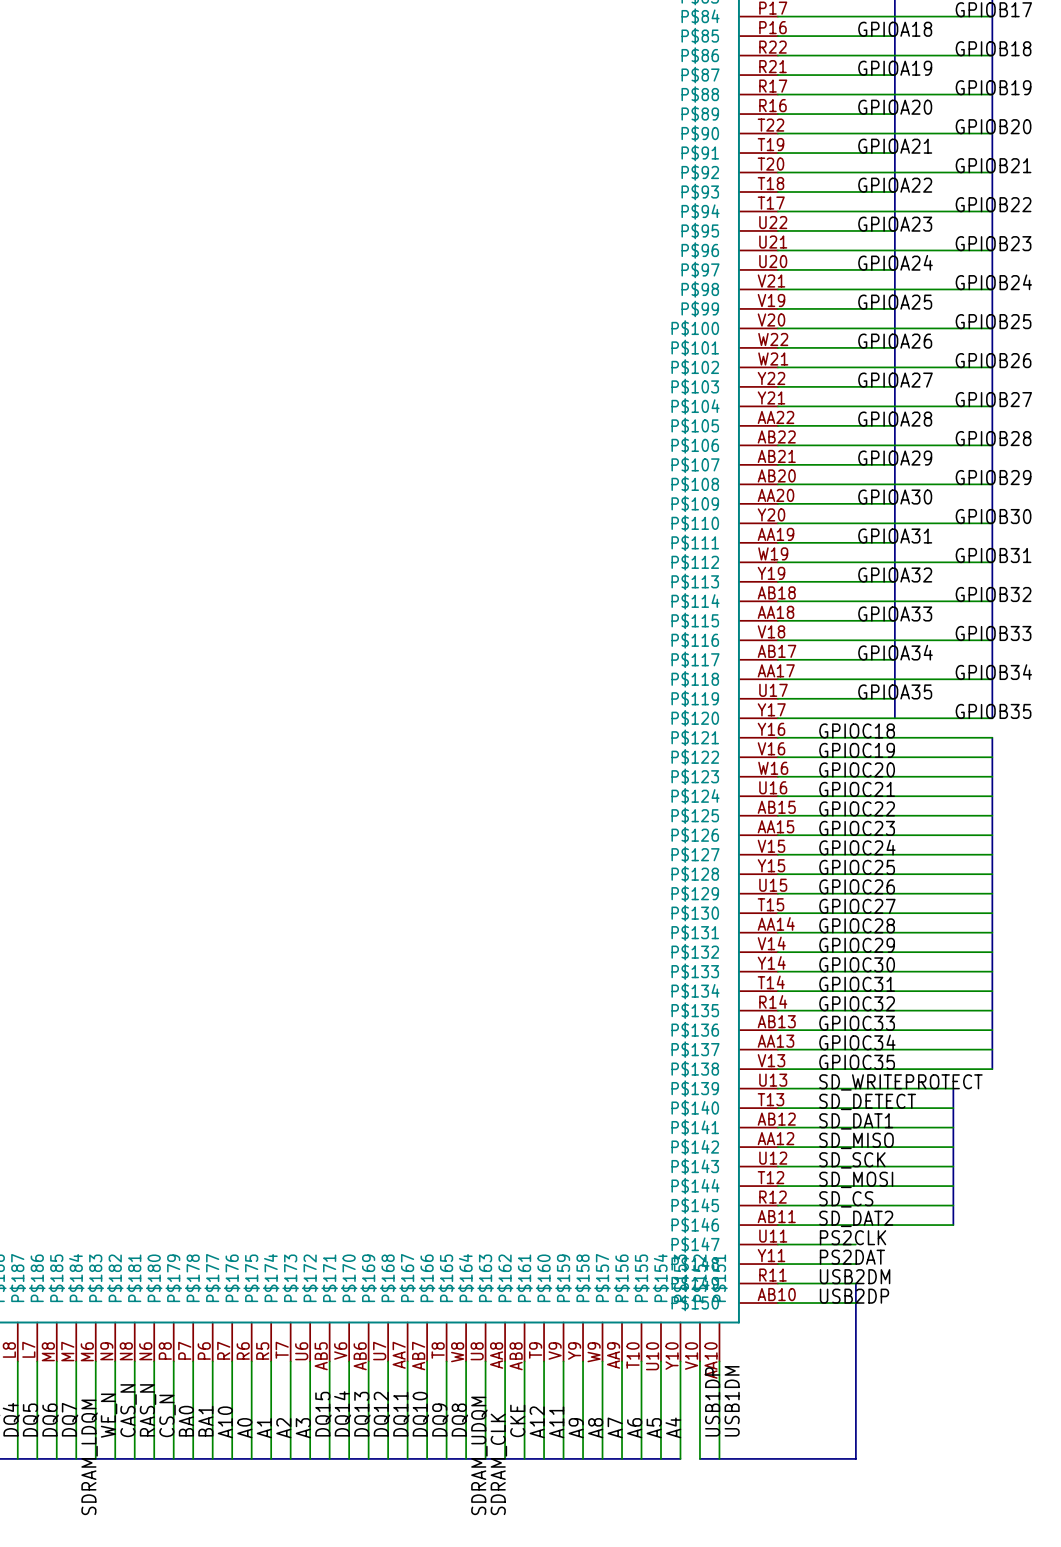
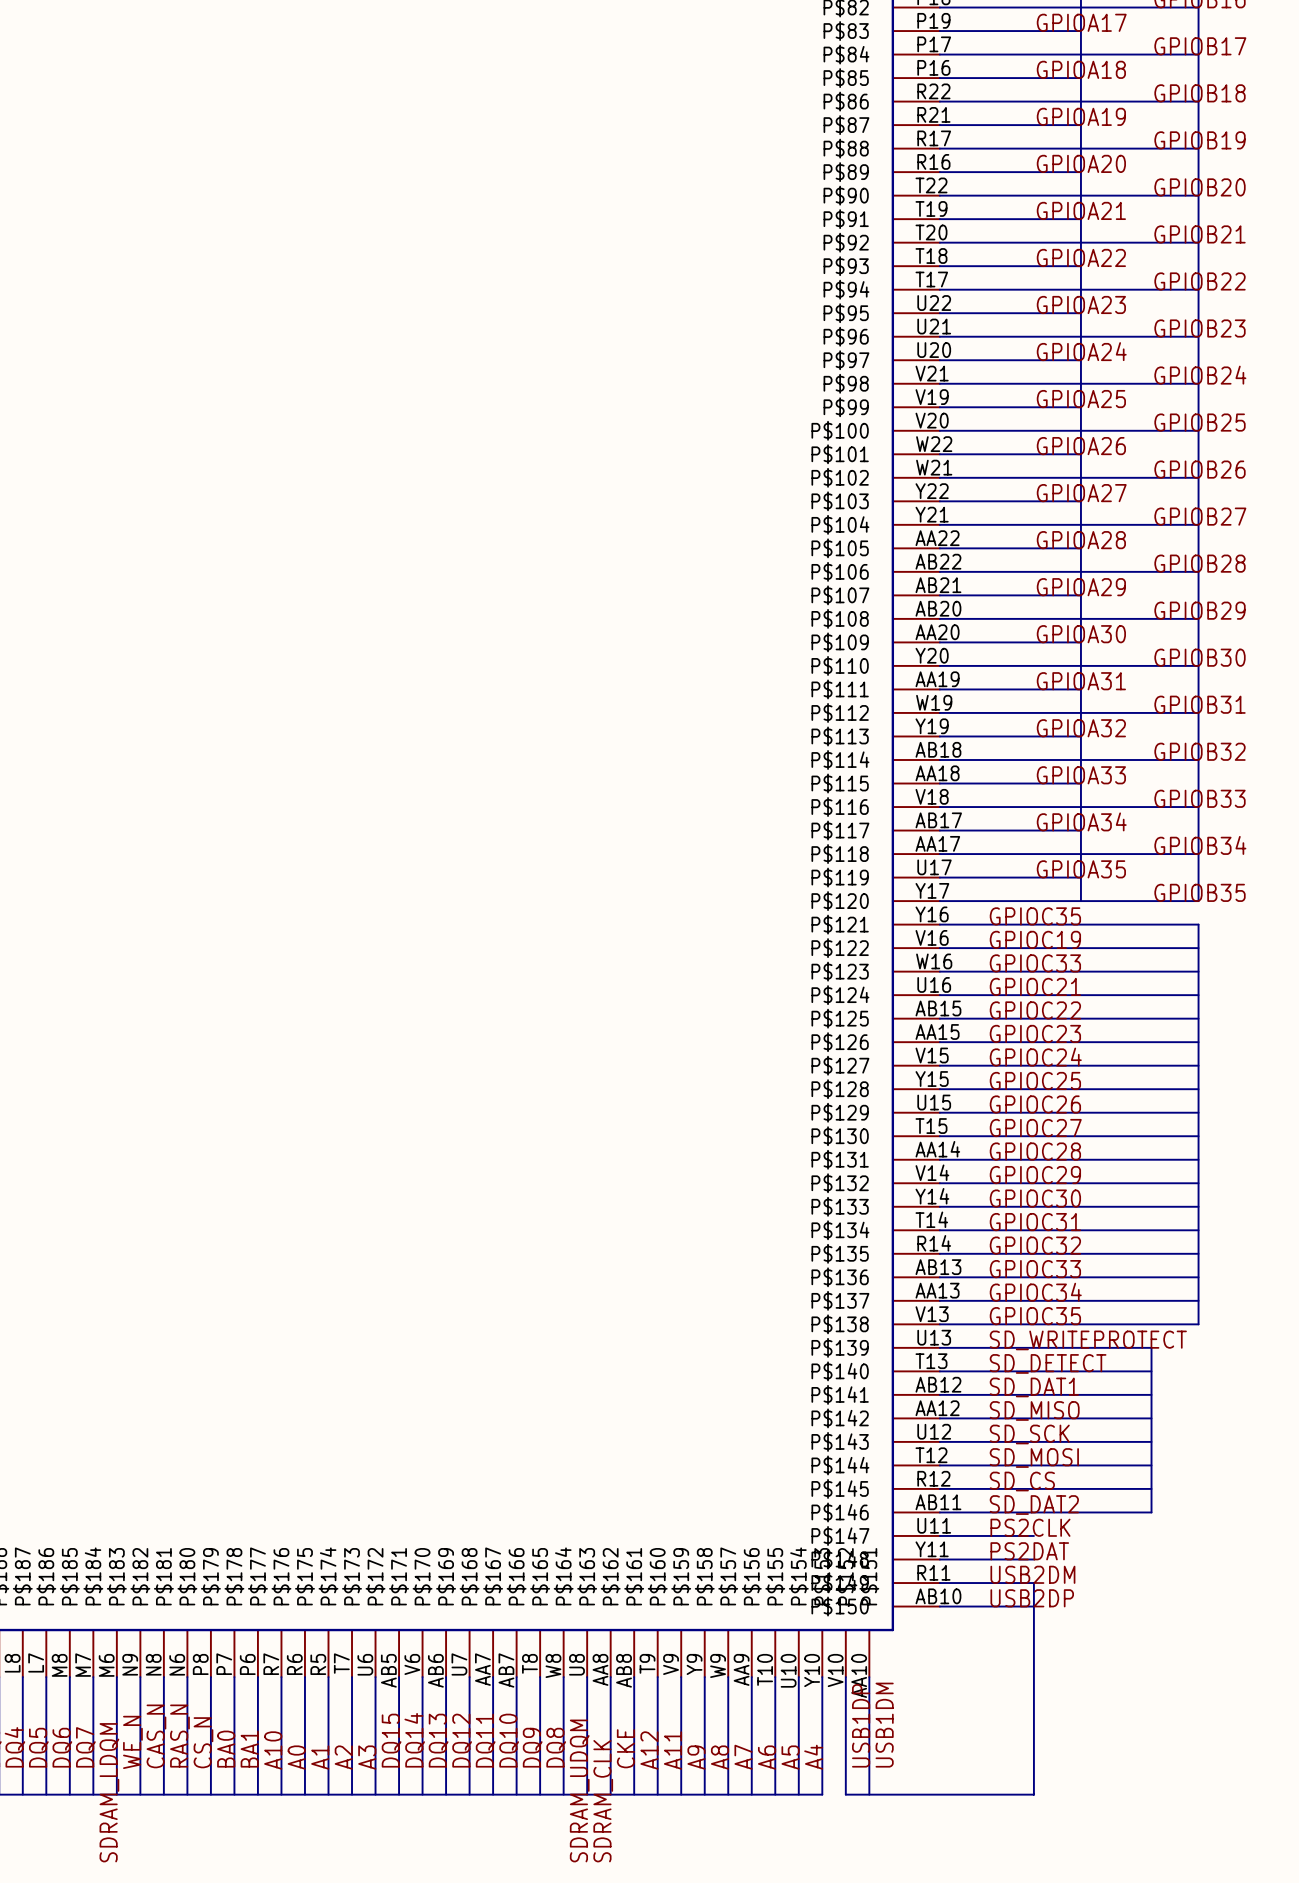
label: GPIOC18 (857, 730) -> GPIOC35 (1035, 916)
label: GPIOC20 (857, 769) -> GPIOC33 (1035, 963)

